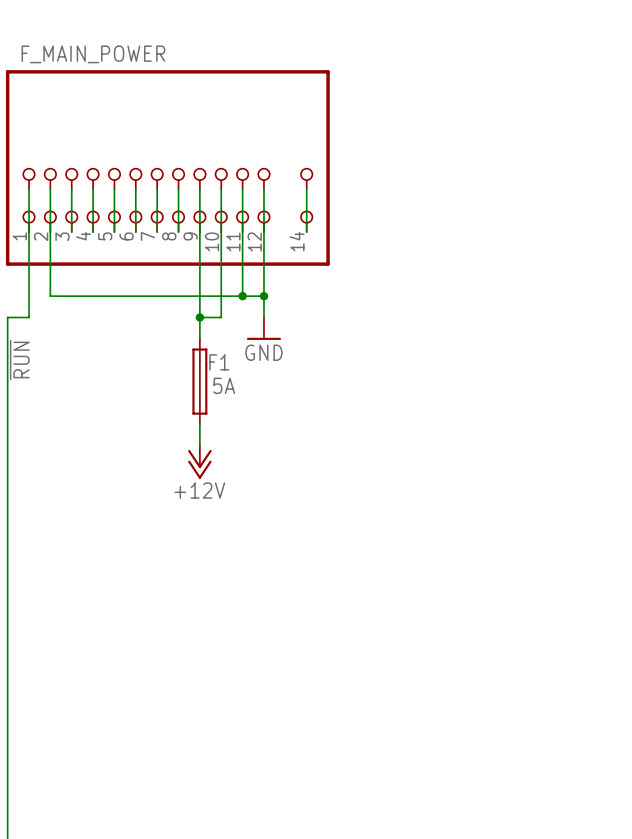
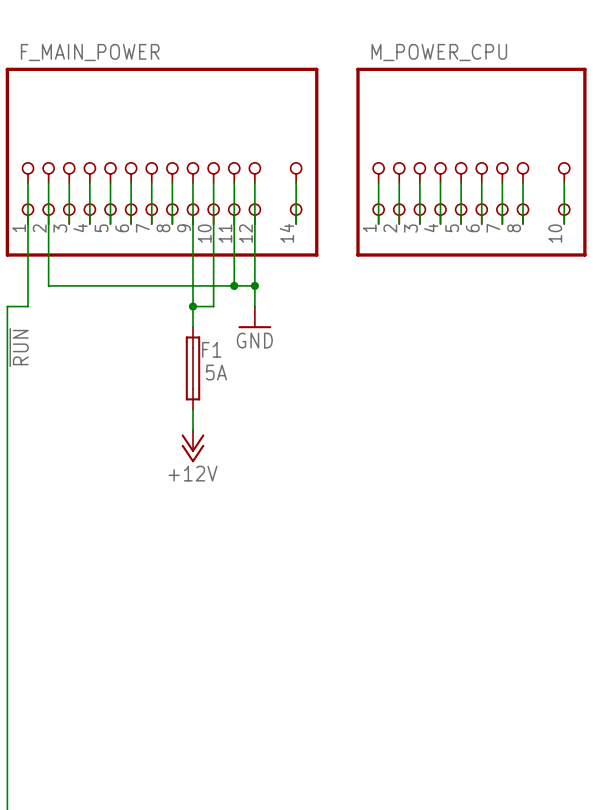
M_POWER_CPU: none -> (471, 162)
wire: none -> (378, 182) (378, 224)
wire: none -> (399, 182) (399, 224)
wire: none -> (419, 182) (419, 224)
wire: none -> (440, 182) (440, 224)
wire: none -> (461, 182) (461, 224)
wire: none -> (481, 182) (481, 224)
wire: none -> (502, 182) (502, 224)
wire: none -> (523, 182) (523, 224)
wire: none -> (564, 182) (564, 224)

